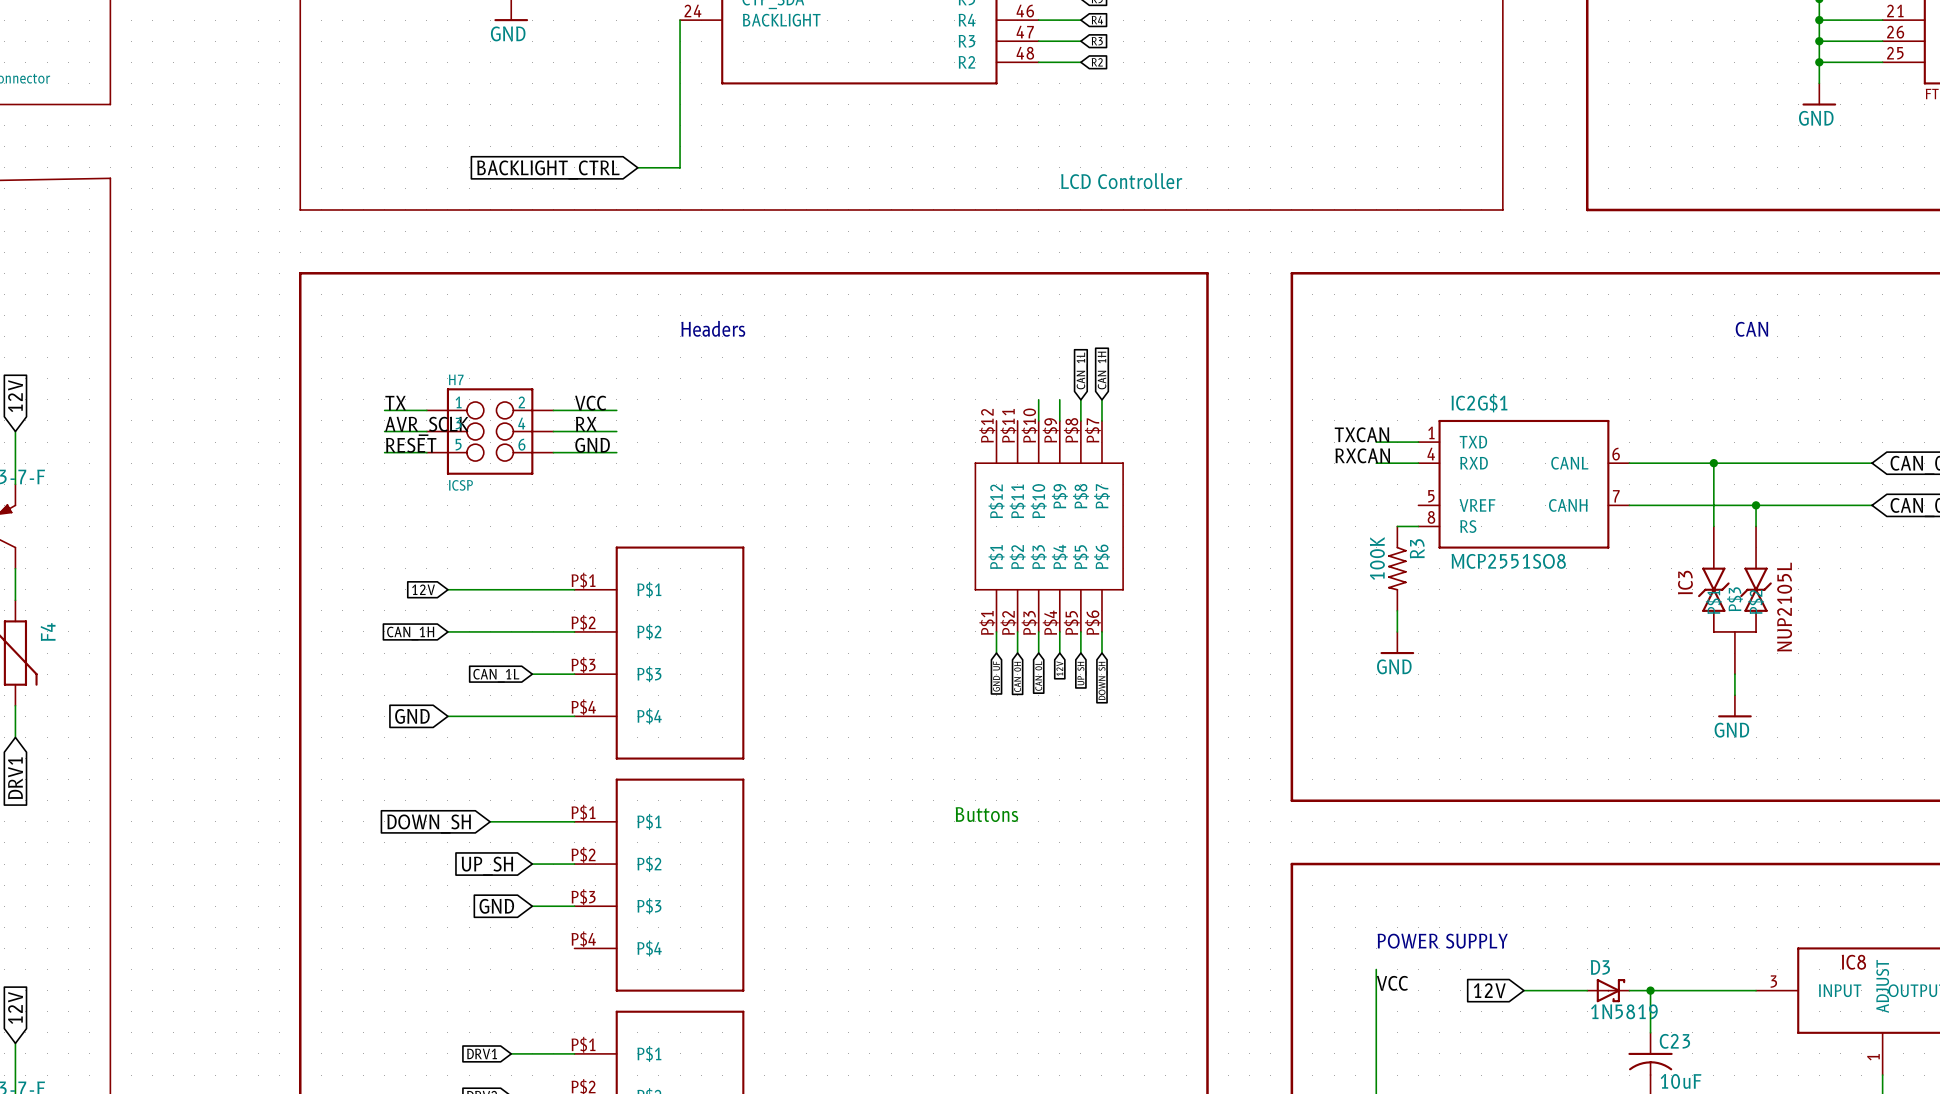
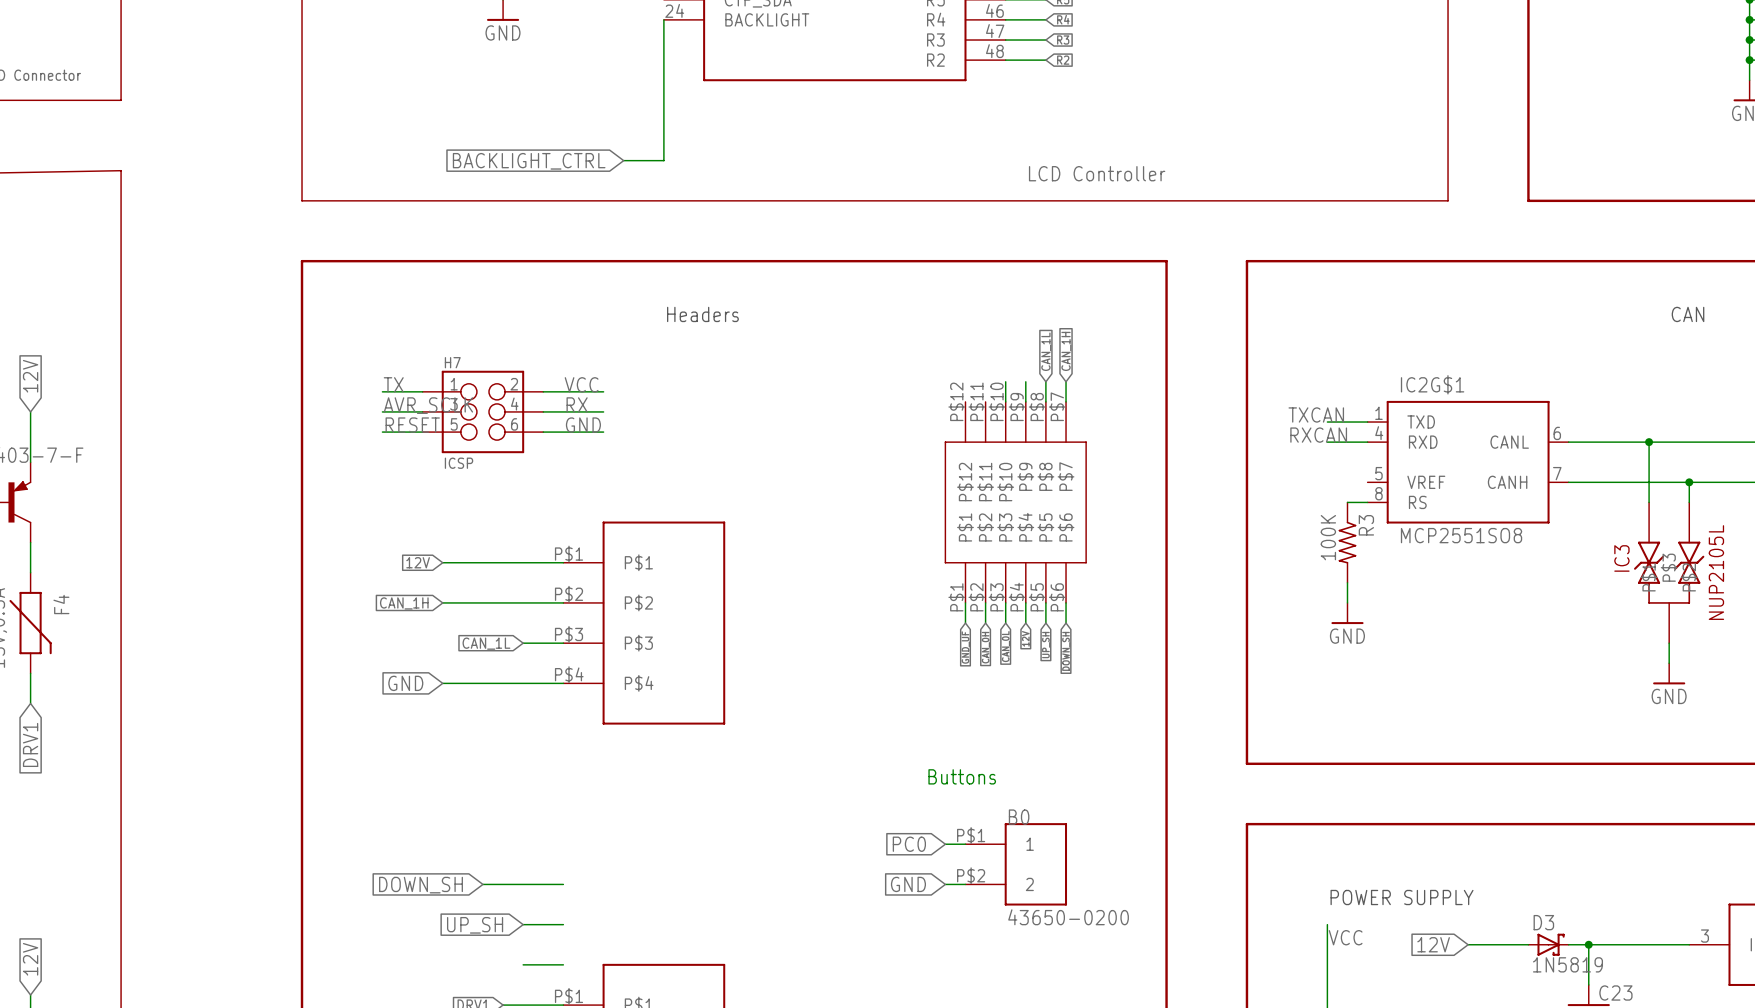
wire: (490, 821) (574, 821) -> (482, 884) (563, 884)
global label position: DOWN_SH (429, 824) -> DOWN_SH (420, 885)
wire: (532, 864) (574, 864) -> (523, 924) (563, 924)
global label position: UP_SH (487, 866) -> UP_SH (475, 925)
part: (659, 885) -> none
global label: none -> PC0 (909, 844)
wire: none -> (945, 844) (965, 844)
global label: GND (496, 906) -> none
wire: (532, 906) (574, 906) -> (523, 964) (563, 964)
B0: none -> 43650-0200 (1016, 864)
global label: none -> GND (908, 884)
wire: none -> (945, 884) (965, 884)

